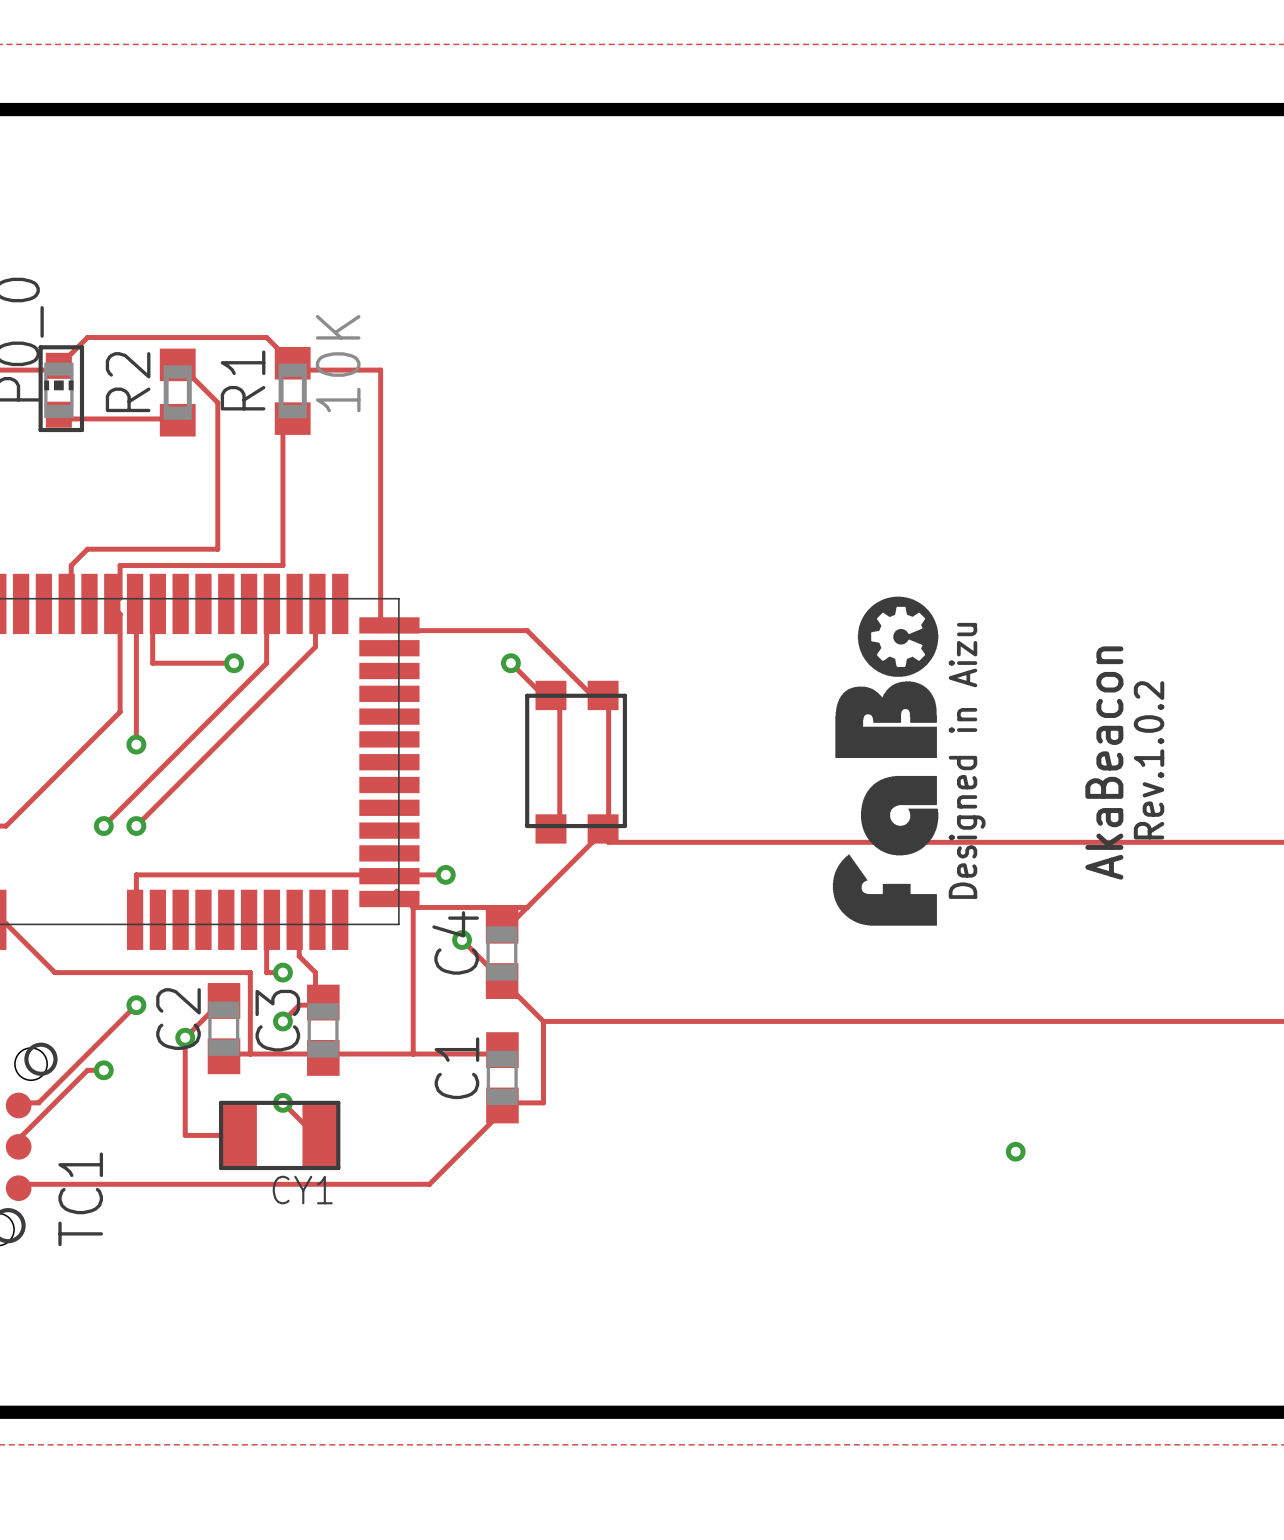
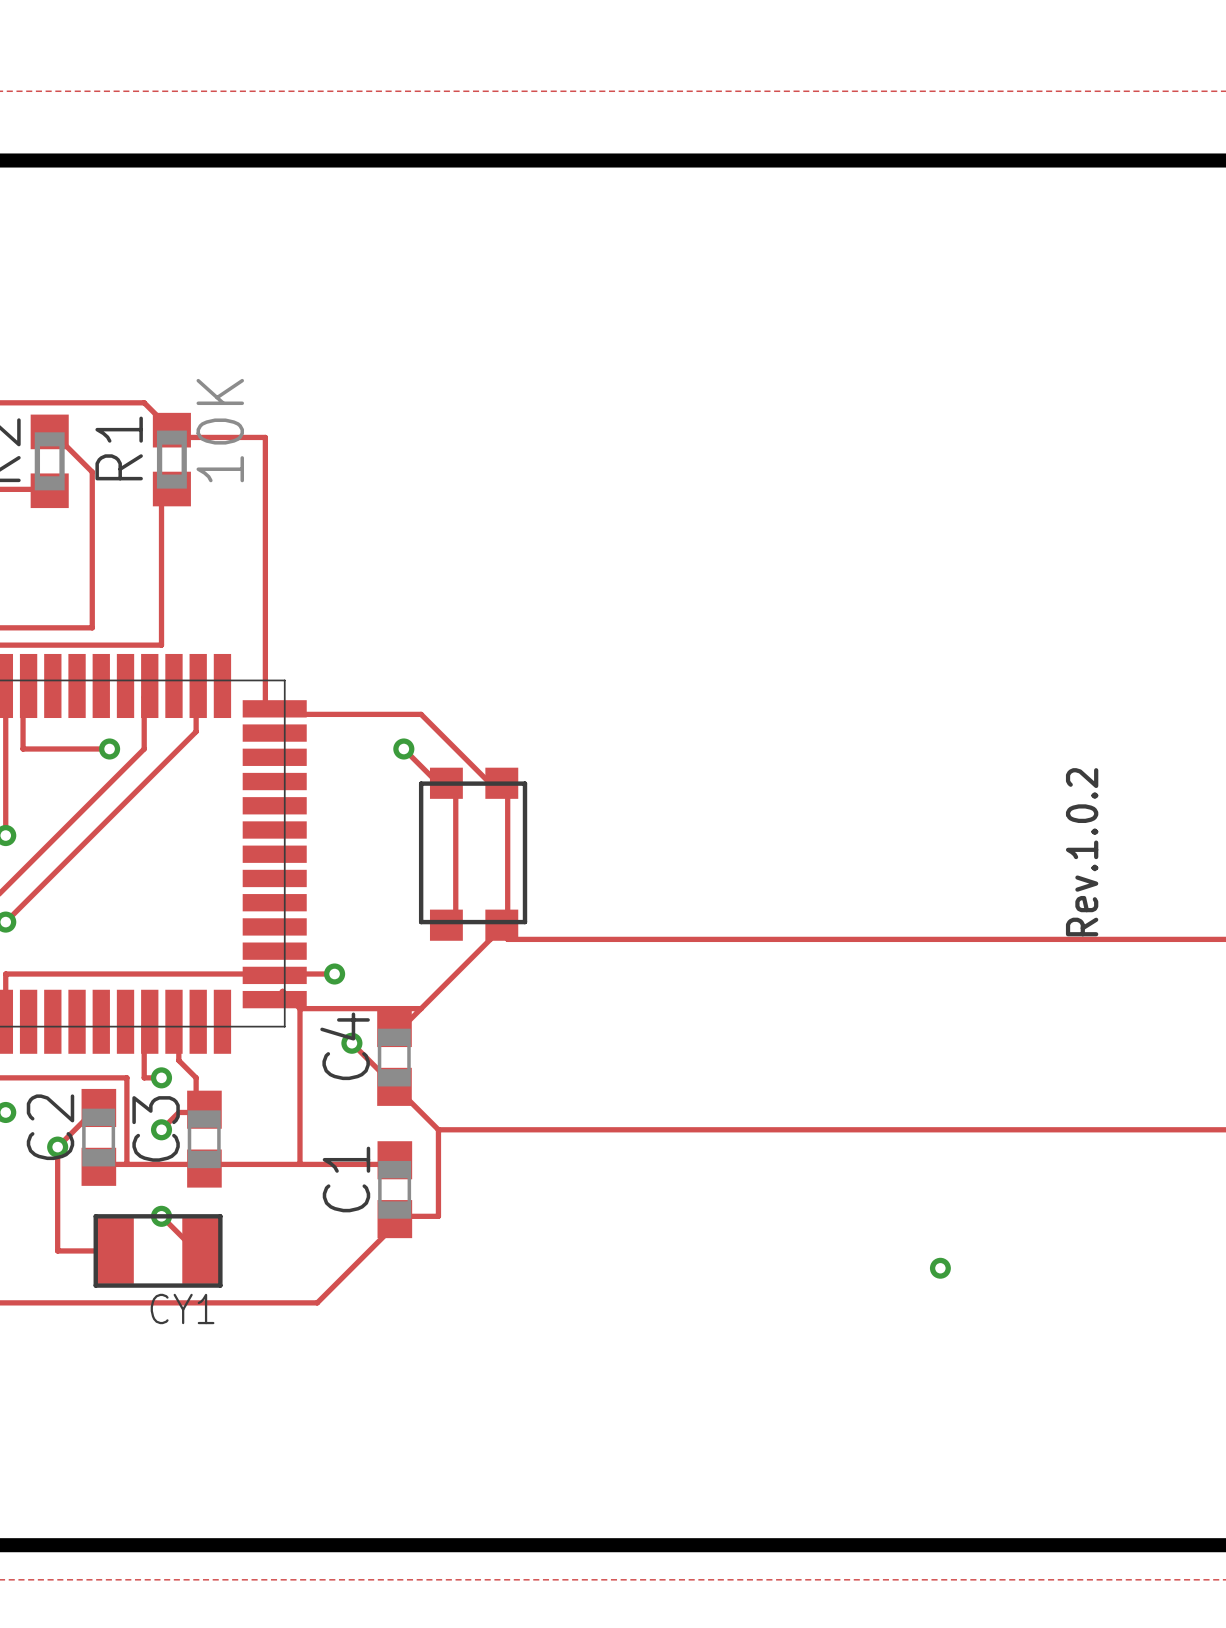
drawing: [832, 596, 939, 926] -> none
text: Designed in Aizu (967, 760) -> none
text: AkaBeacon (1104, 763) -> none

